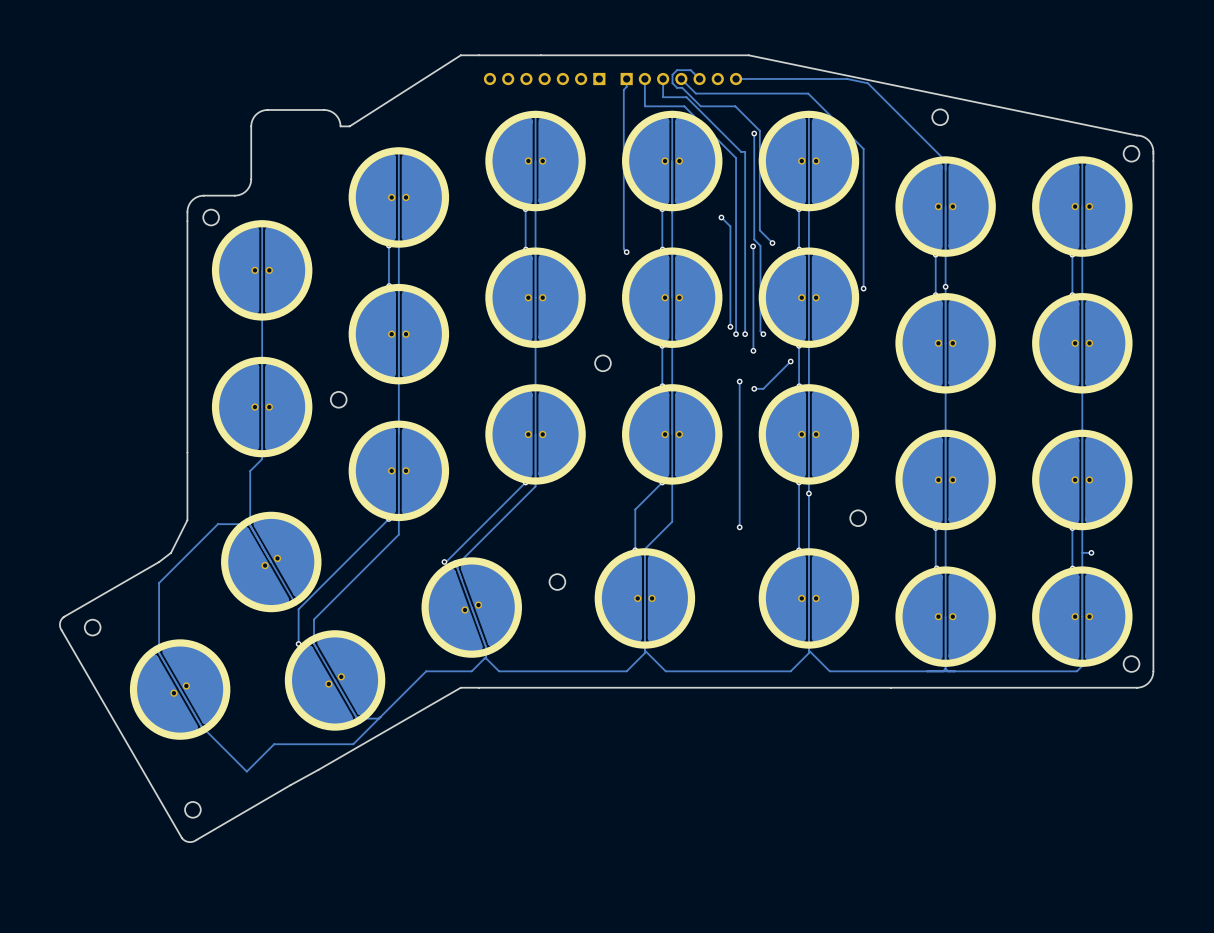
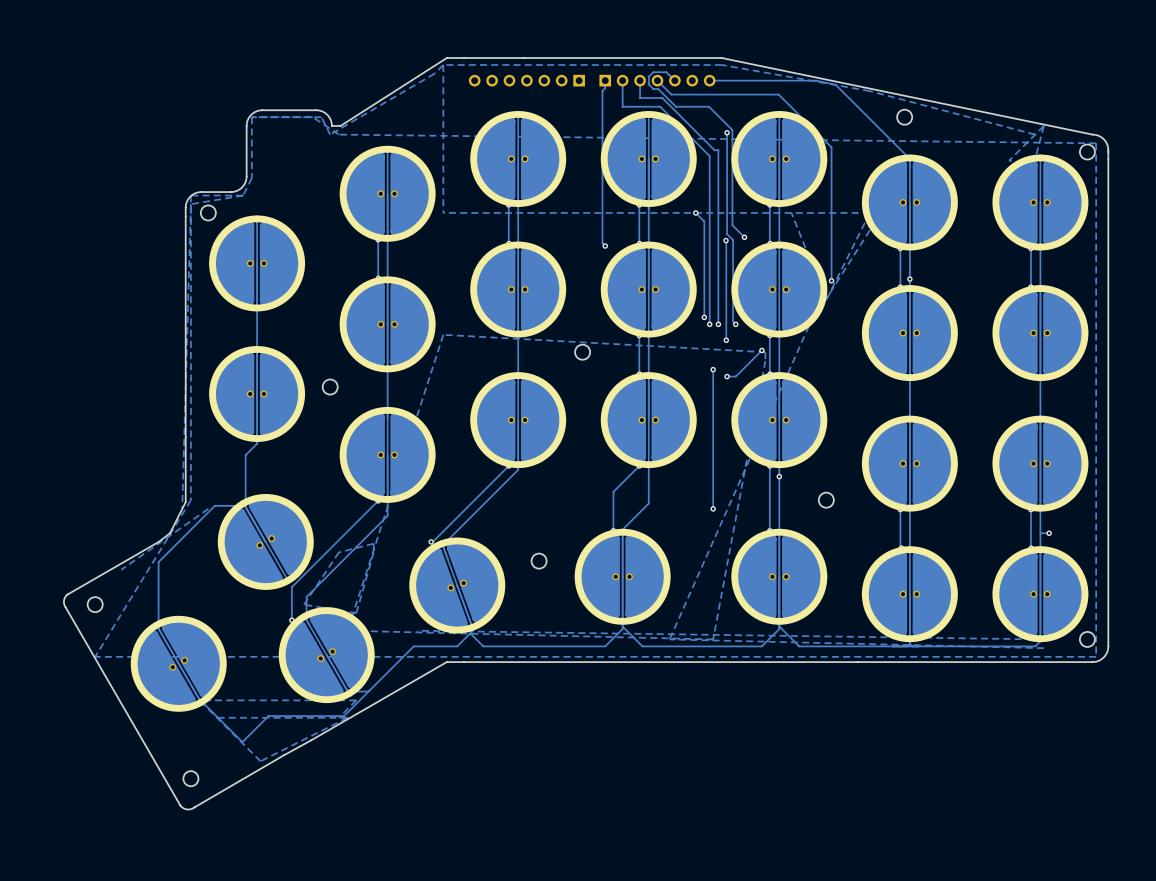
zone outline: none -> (443, 64) (721, 64) (869, 91) (1035, 134)
zone outline: none -> (443, 64) (443, 212) (869, 212) (826, 299) (791, 212)
zone outline: none -> (443, 64) (434, 73) (330, 134) (321, 117) (251, 117) (251, 178) (243, 195)
zone outline: none -> (312, 117) (338, 134) (1096, 143) (1096, 656) (95, 656) (190, 500) (190, 195) (243, 195)
zone outline: none -> (1043, 125) (1033, 164) (1009, 160) (1043, 125)
zone outline: none -> (243, 195) (190, 204) (182, 508)
zone outline: none -> (869, 230) (808, 326) (669, 639) (1043, 648)
zone outline: none -> (443, 334) (765, 352) (765, 360) (713, 639) (347, 630) (443, 334)
zone outline: none -> (208, 508) (121, 569)
zone outline: none -> (373, 543) (373, 552) (356, 613) (304, 604) (338, 552) (373, 543)
zone outline: none -> (417, 630) (1043, 639)
zone outline: none -> (338, 717) (356, 700) (199, 700) (260, 761) (347, 717) (217, 717)

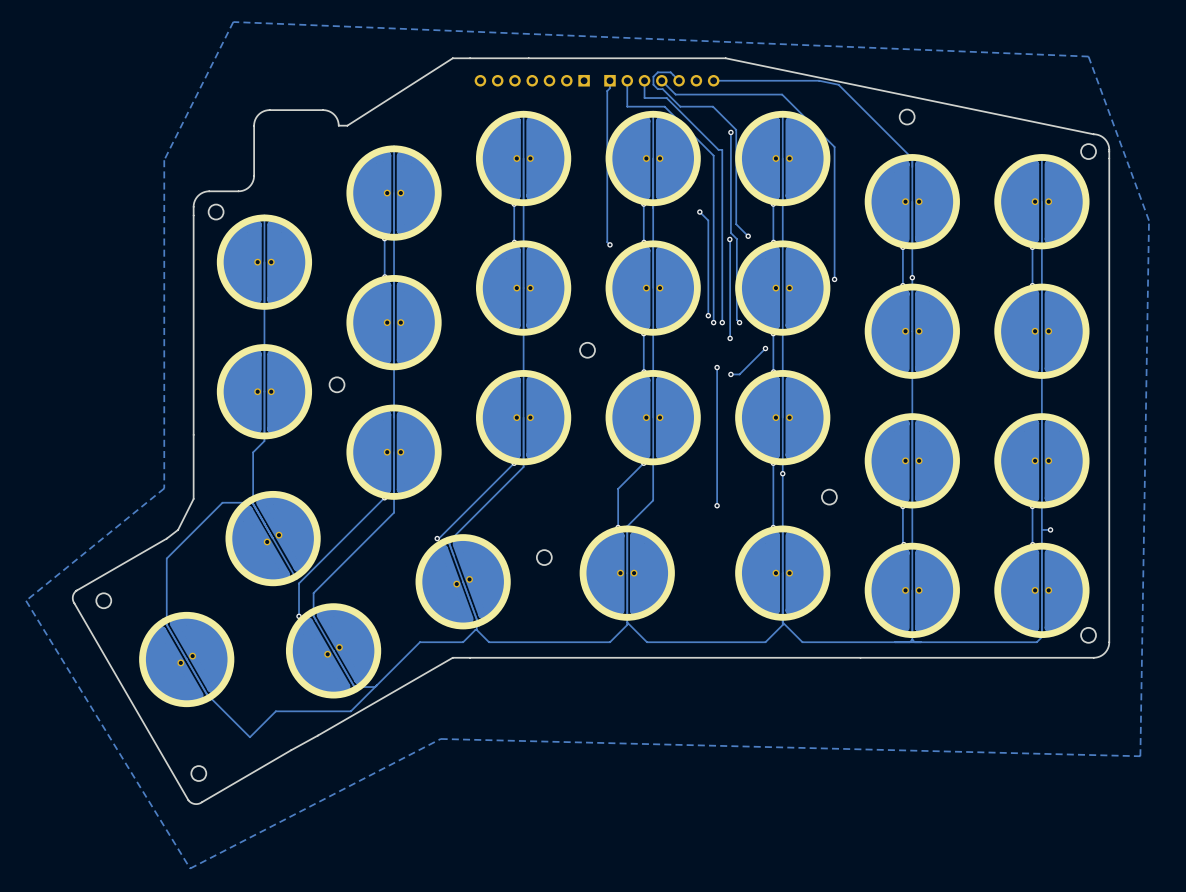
zone outline: none -> (233, 22) (1088, 56) (1149, 220) (1140, 756) (440, 738) (190, 868) (26, 600) (164, 488) (164, 160) (233, 22)
zone outline: (443, 64) (721, 64) (869, 91) (1035, 134) -> none
zone outline: (443, 64) (443, 212) (869, 212) (826, 299) (791, 212) -> none
zone outline: (443, 64) (434, 73) (330, 134) (321, 117) (251, 117) (251, 178) (243, 195) -> none
zone outline: (312, 117) (338, 134) (1096, 143) (1096, 656) (95, 656) (190, 500) (190, 195) (243, 195) -> none
zone outline: (1043, 125) (1033, 164) (1009, 160) (1043, 125) -> none
zone outline: (243, 195) (190, 204) (182, 508) -> none
zone outline: (869, 230) (808, 326) (669, 639) (1043, 648) -> none
zone outline: (443, 334) (765, 352) (765, 360) (713, 639) (347, 630) (443, 334) -> none
zone outline: (208, 508) (121, 569) -> none
zone outline: (373, 543) (373, 552) (356, 613) (304, 604) (338, 552) (373, 543) -> none
zone outline: (417, 630) (1043, 639) -> none
zone outline: (338, 717) (356, 700) (199, 700) (260, 761) (347, 717) (217, 717) -> none

